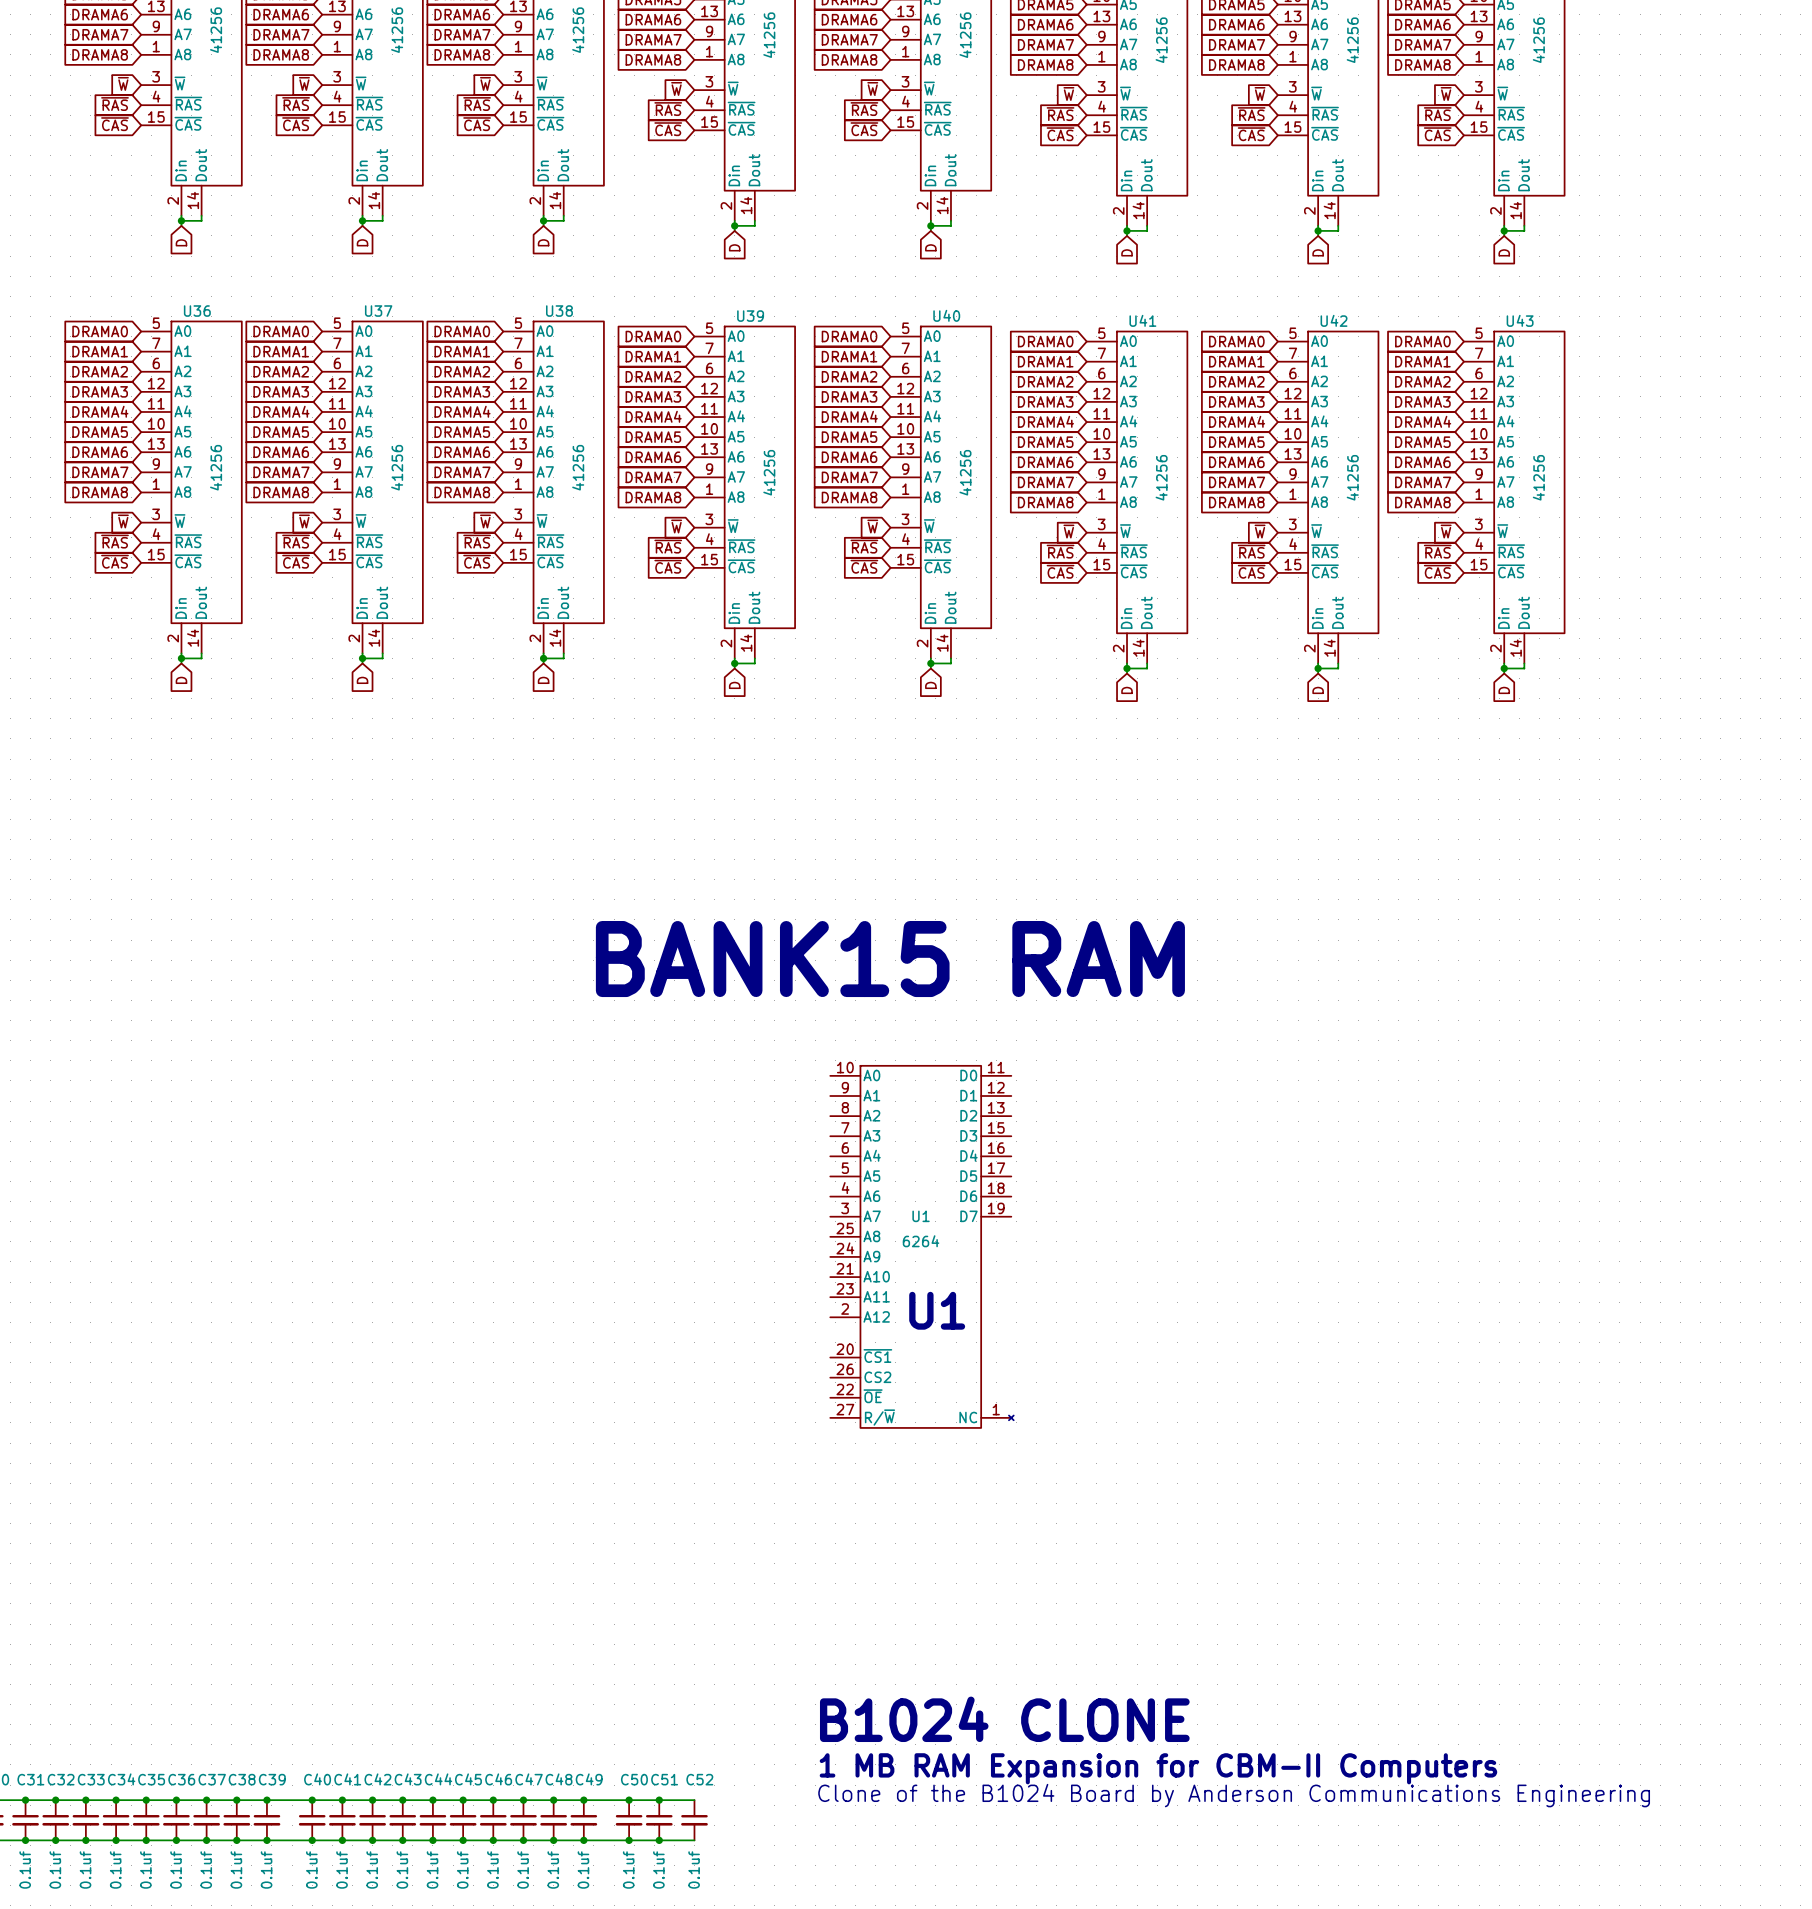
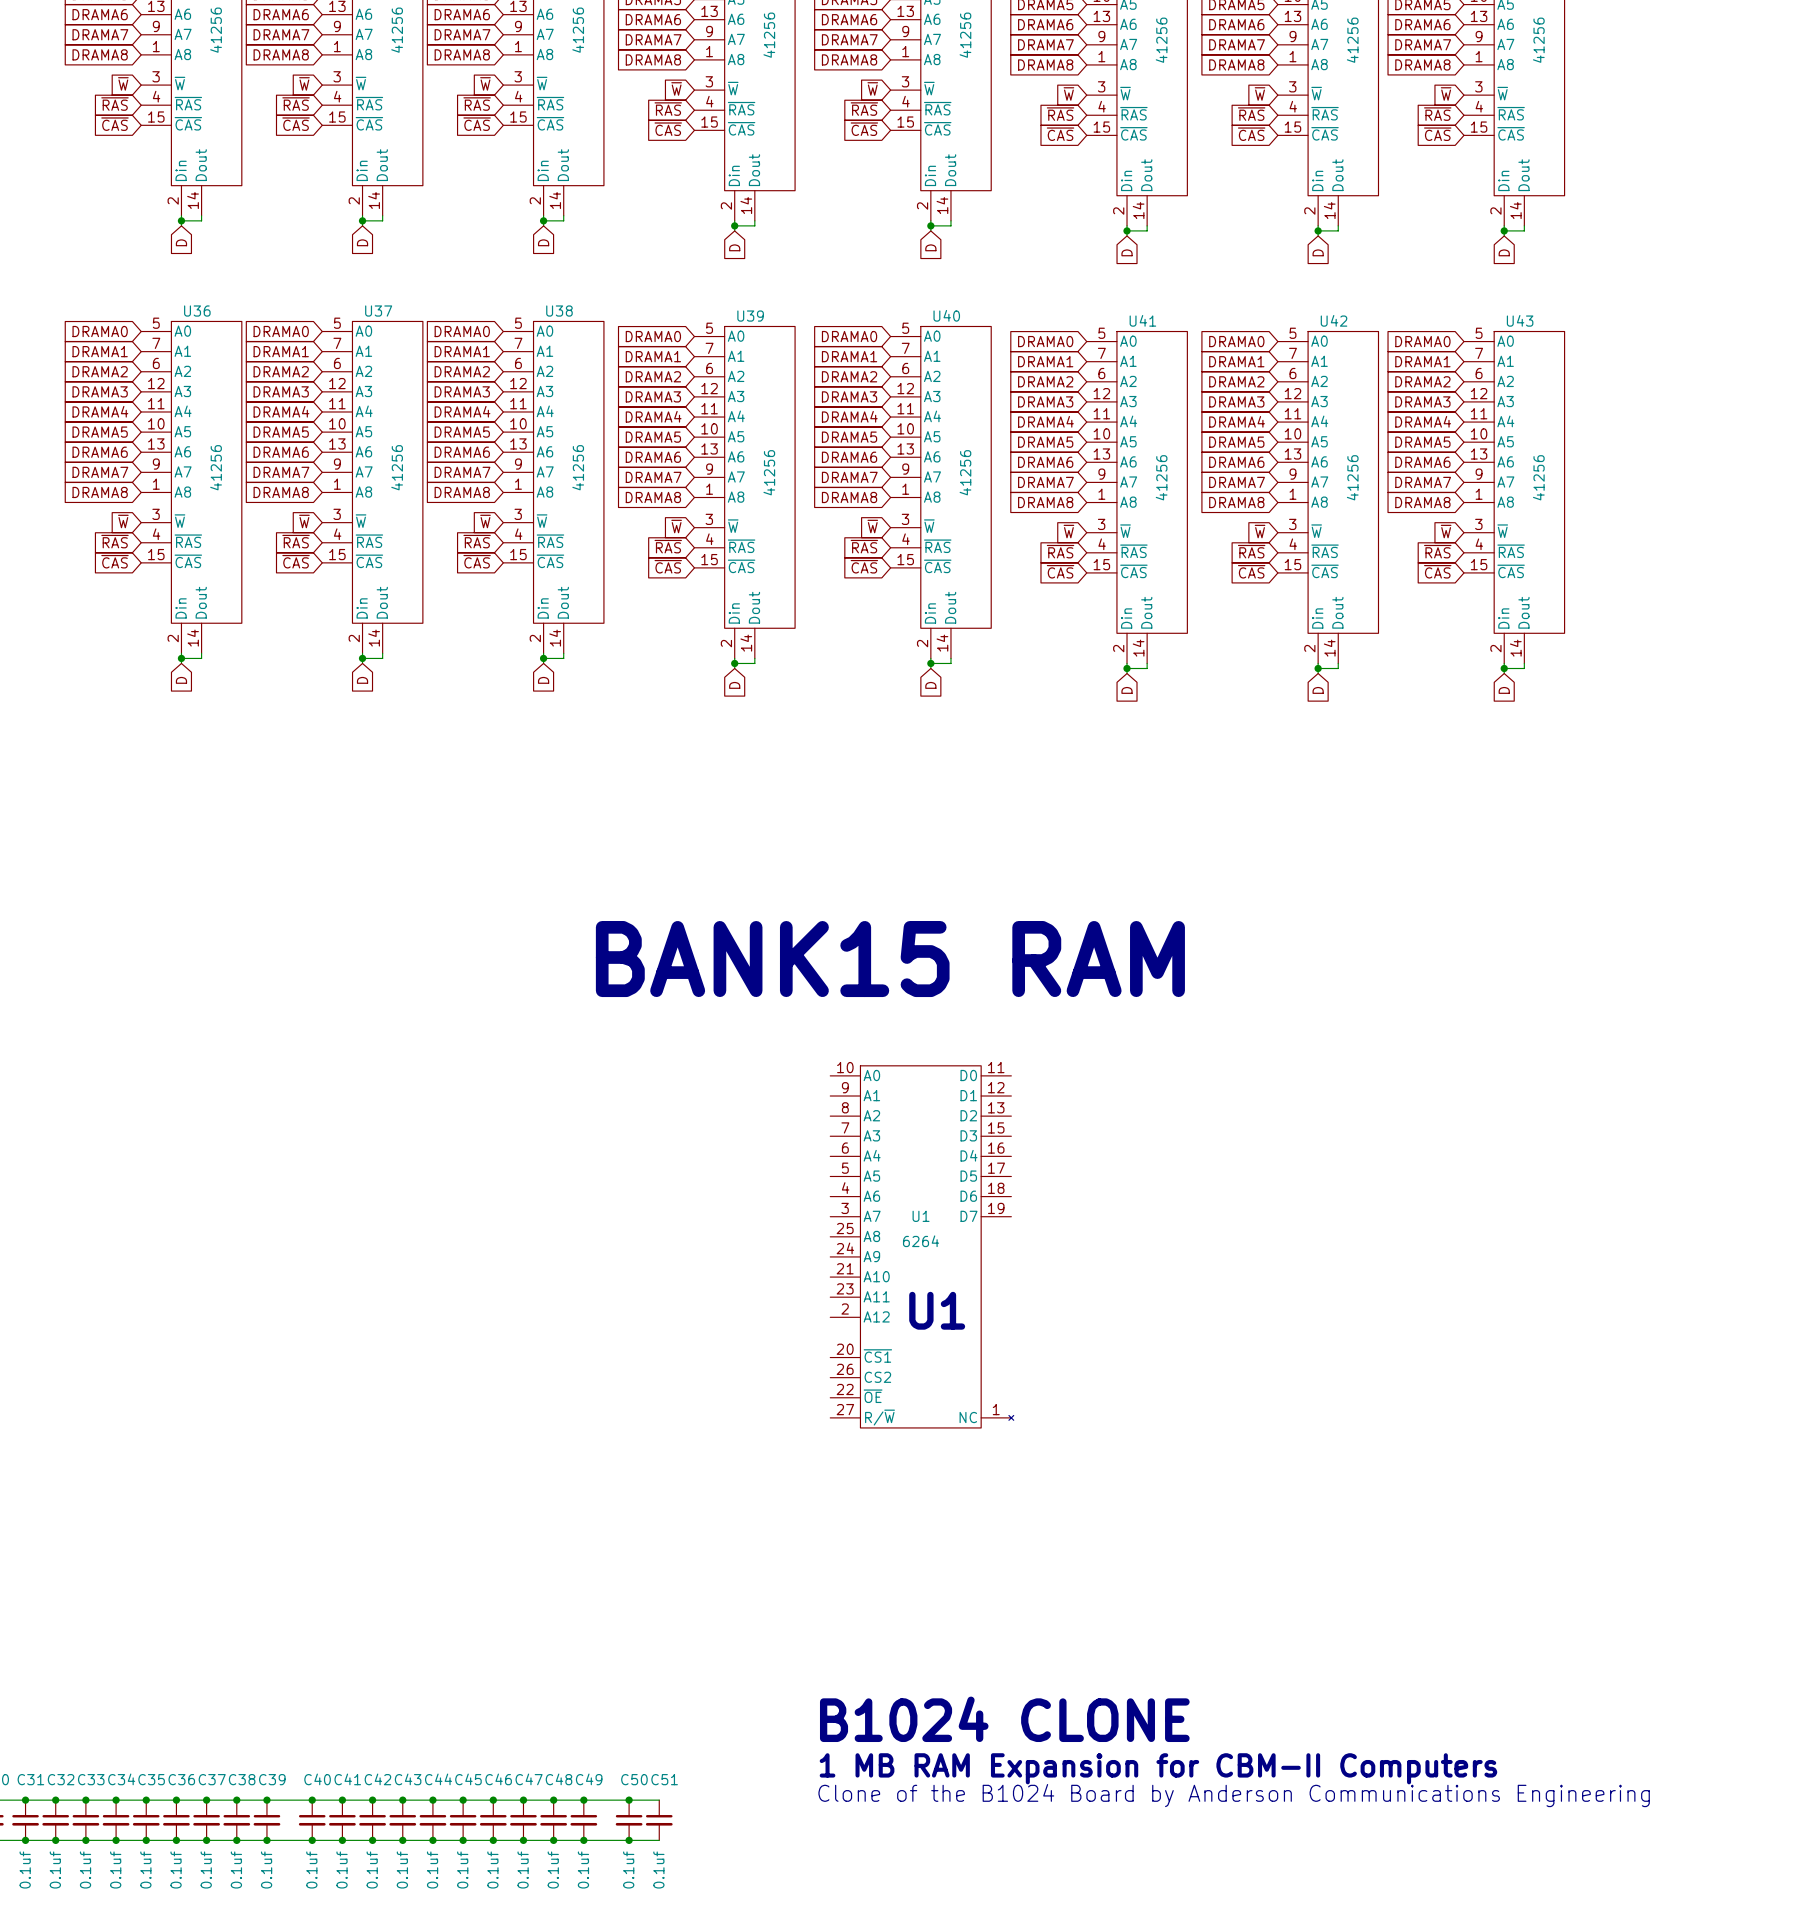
wire: (659, 1800) (694, 1800) -> none
junction: (659, 1800) -> none
C52: 0.1uf (694, 1820) -> none
wire: (659, 1840) (694, 1840) -> none
junction: (659, 1840) -> none

